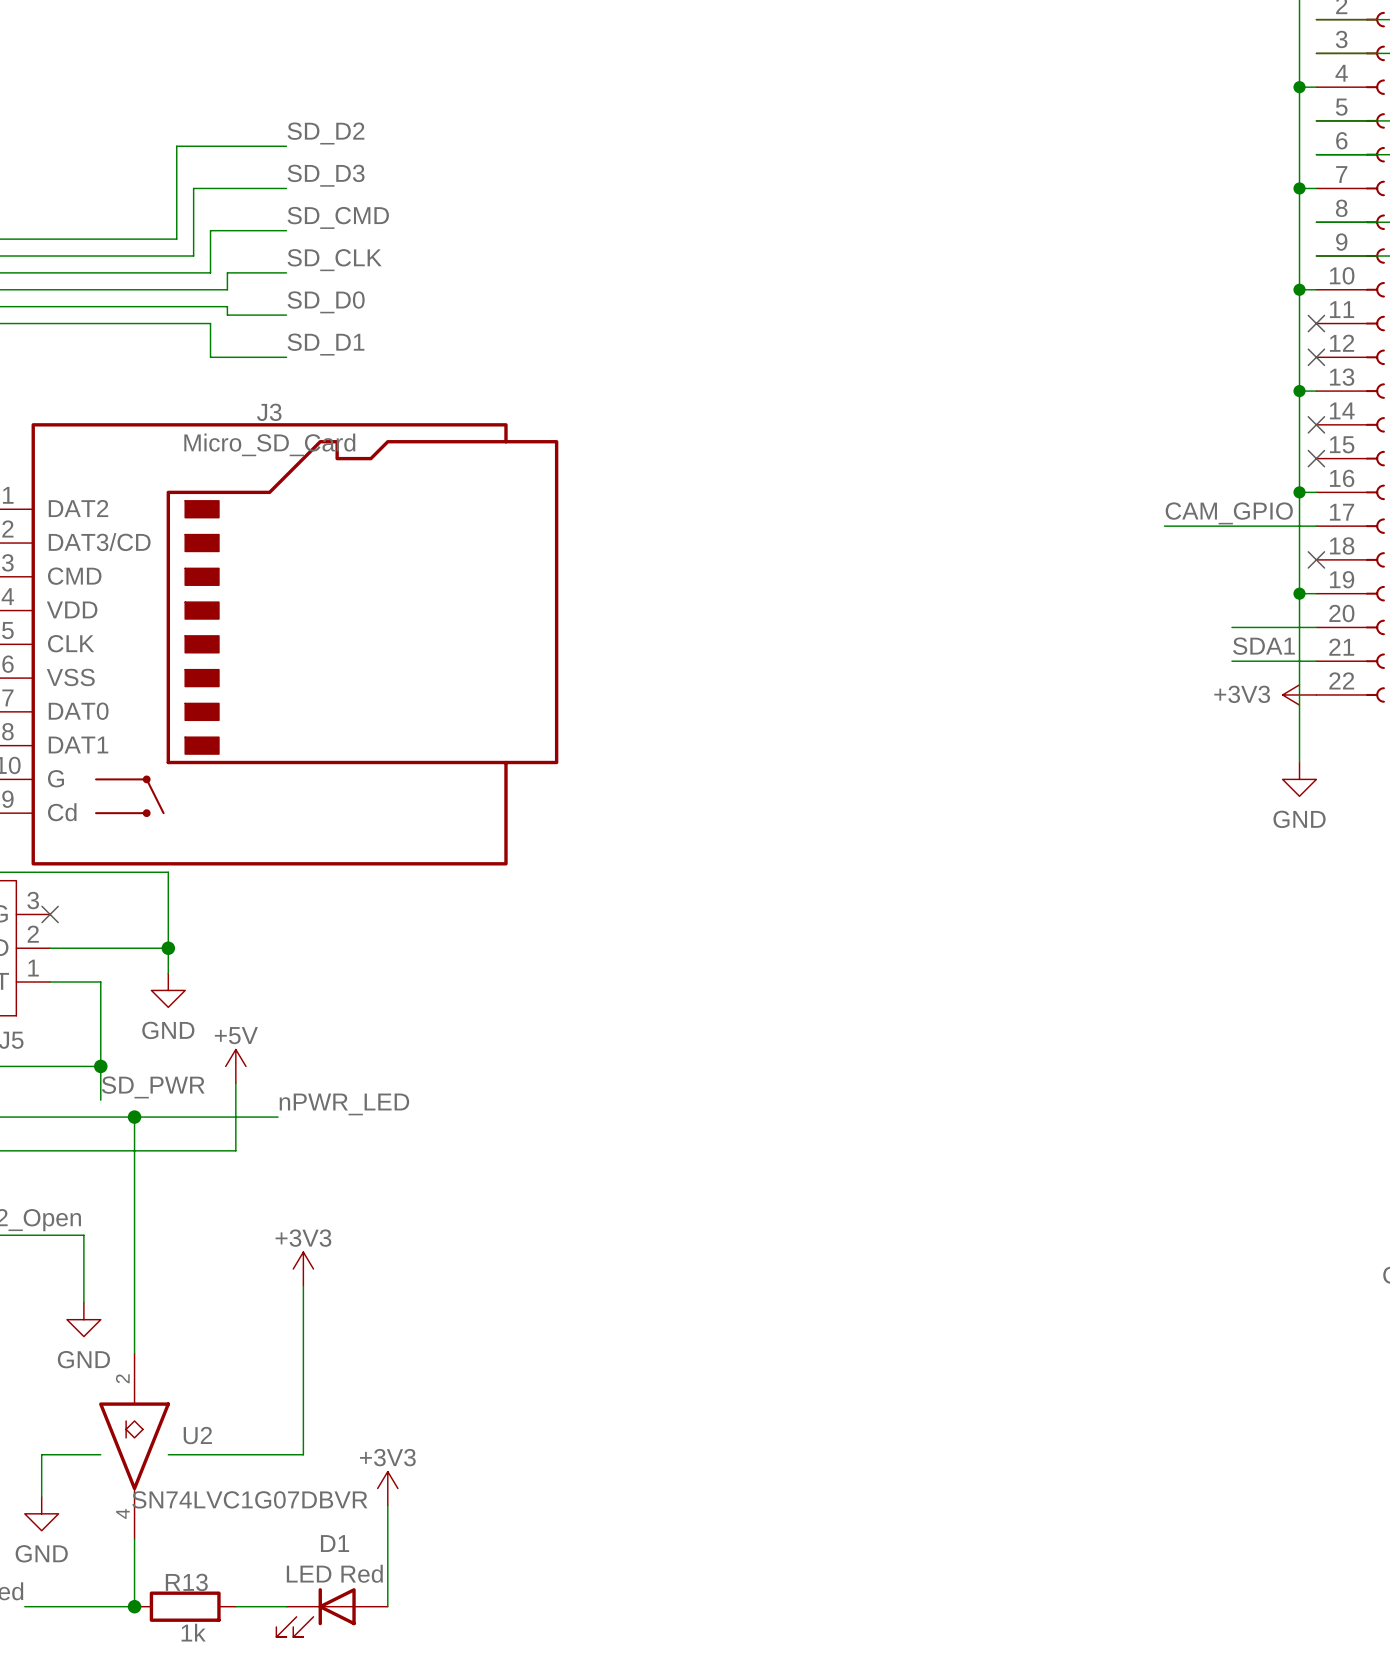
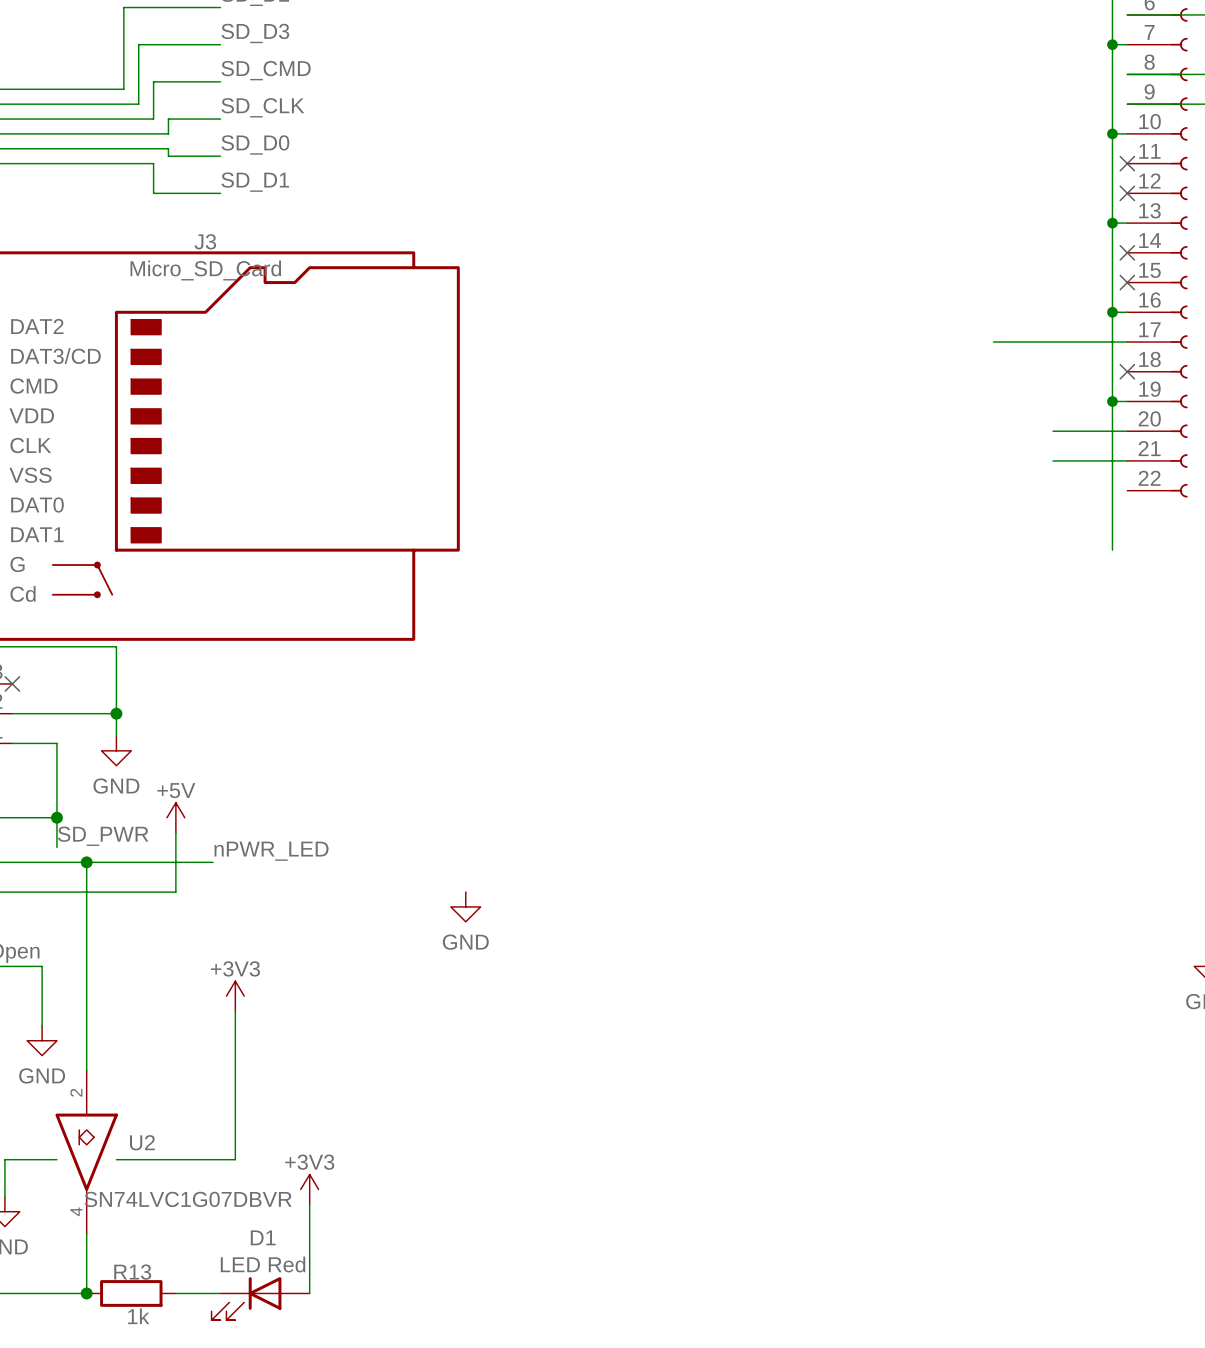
label: CAM_GPIO (1229, 513) -> none
label: SDA1 (1263, 646) -> none
power symbol: +3V3 (1299, 694) -> none
power symbol: GND (1299, 779) -> none
power symbol: none -> GND (465, 906)

